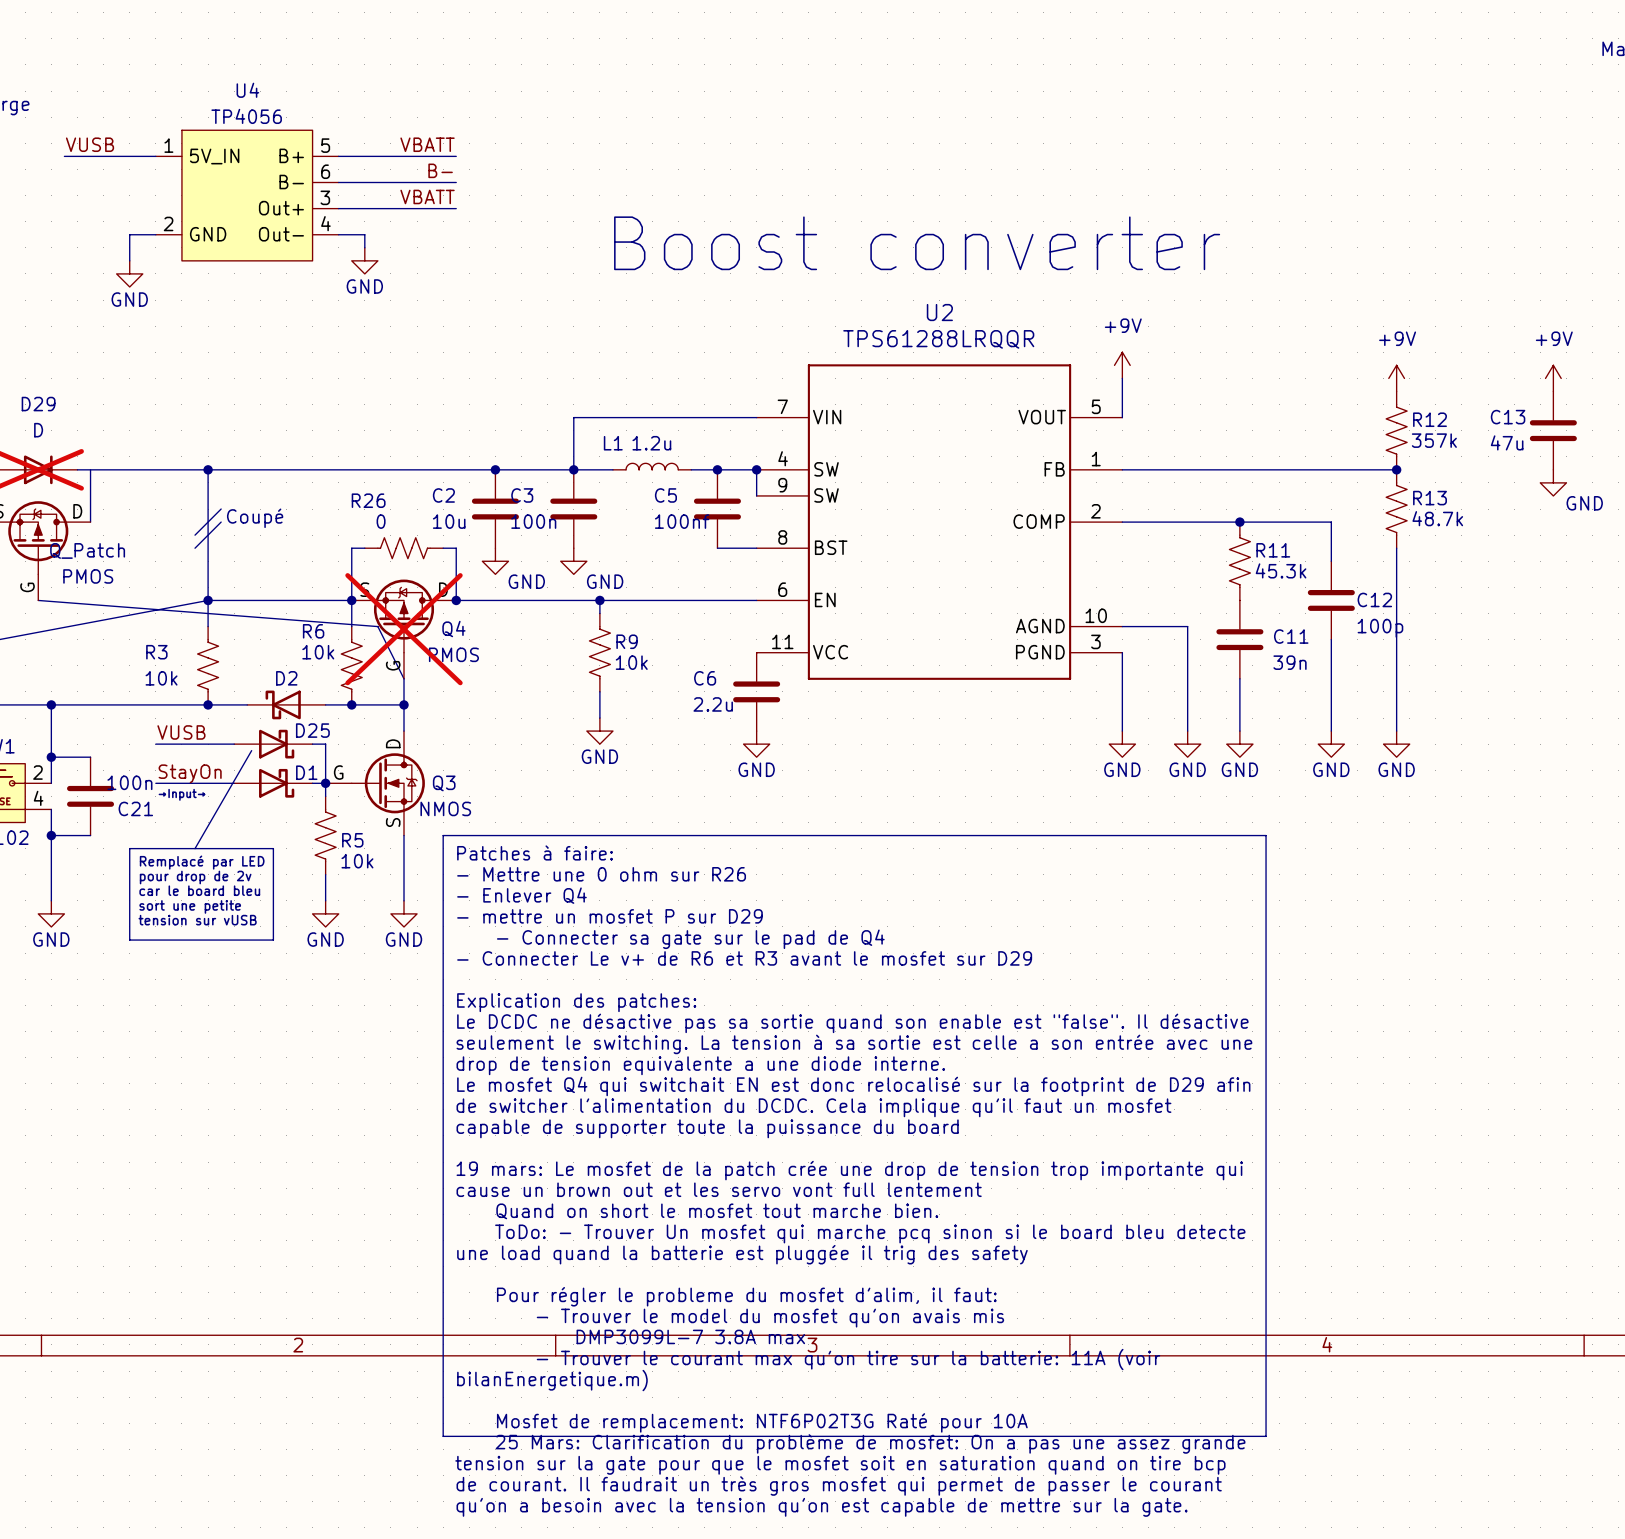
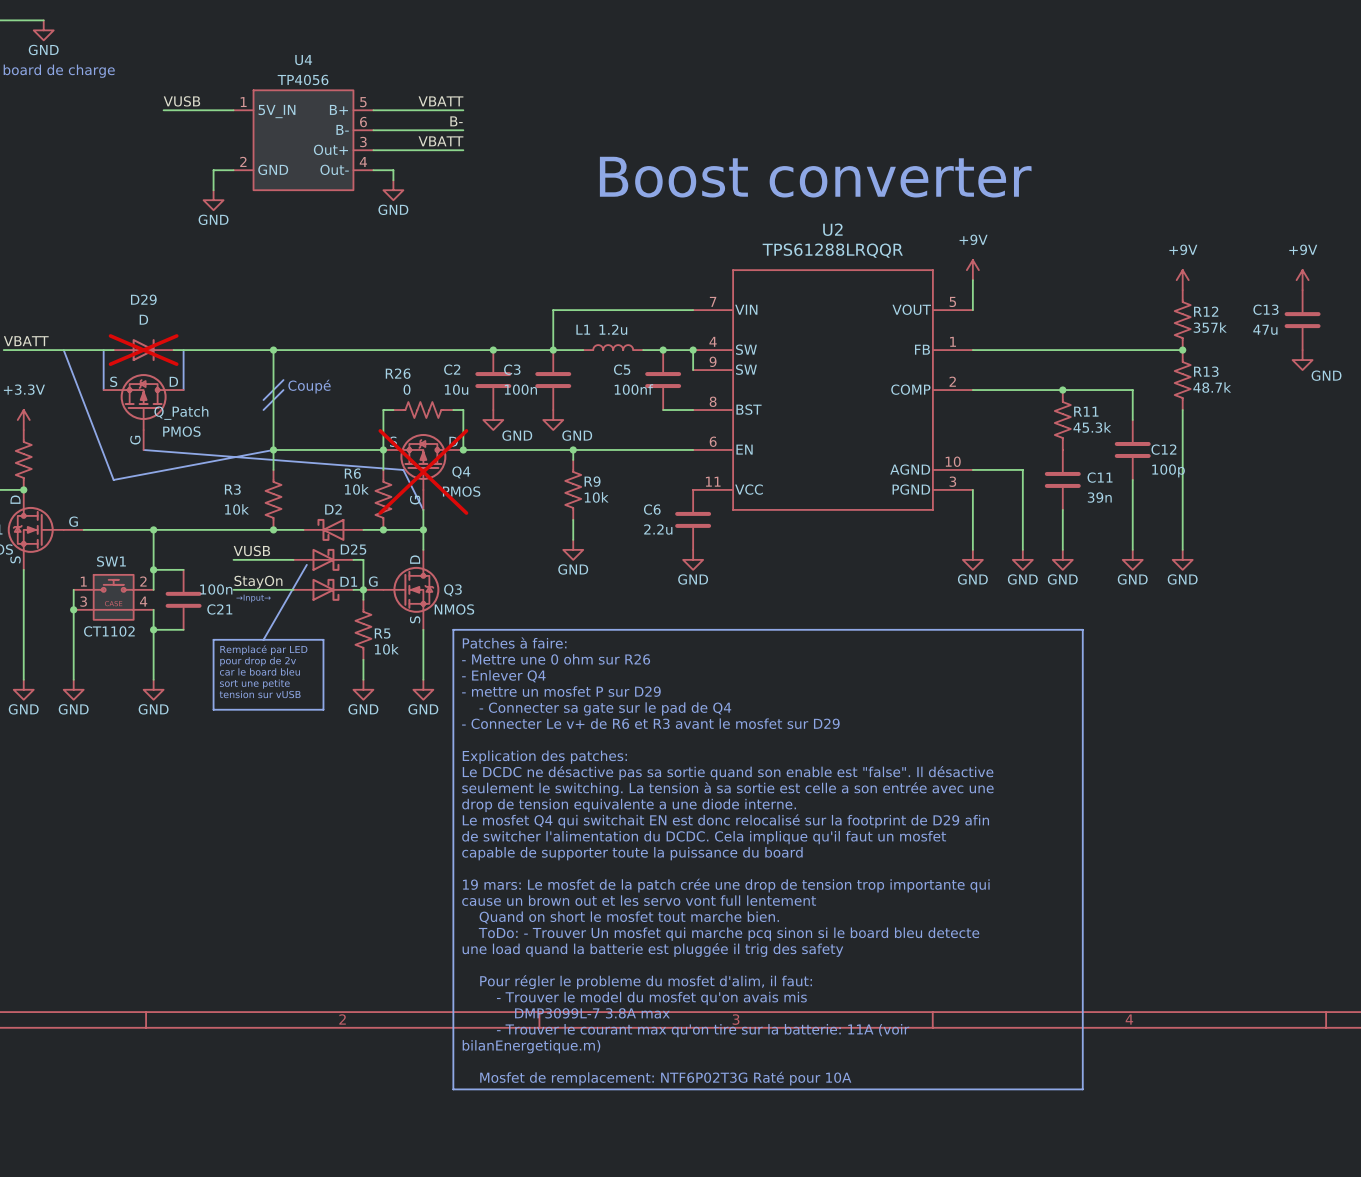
text: 25 Mars: Clarification du problème de mosfet: On a pas une assez grande (870, 1443) -> none
text: tension sur la gate pour que le mosfet soit en saturation quand on tire bcp (840, 1465) -> none
text: de courant. Il faudrait un très gros mosfet qui permet de passer le courant (839, 1486) -> none
text: qu'on a besoin avec la tension qu'on est capable de mettre sur la gate. (822, 1507) -> none

